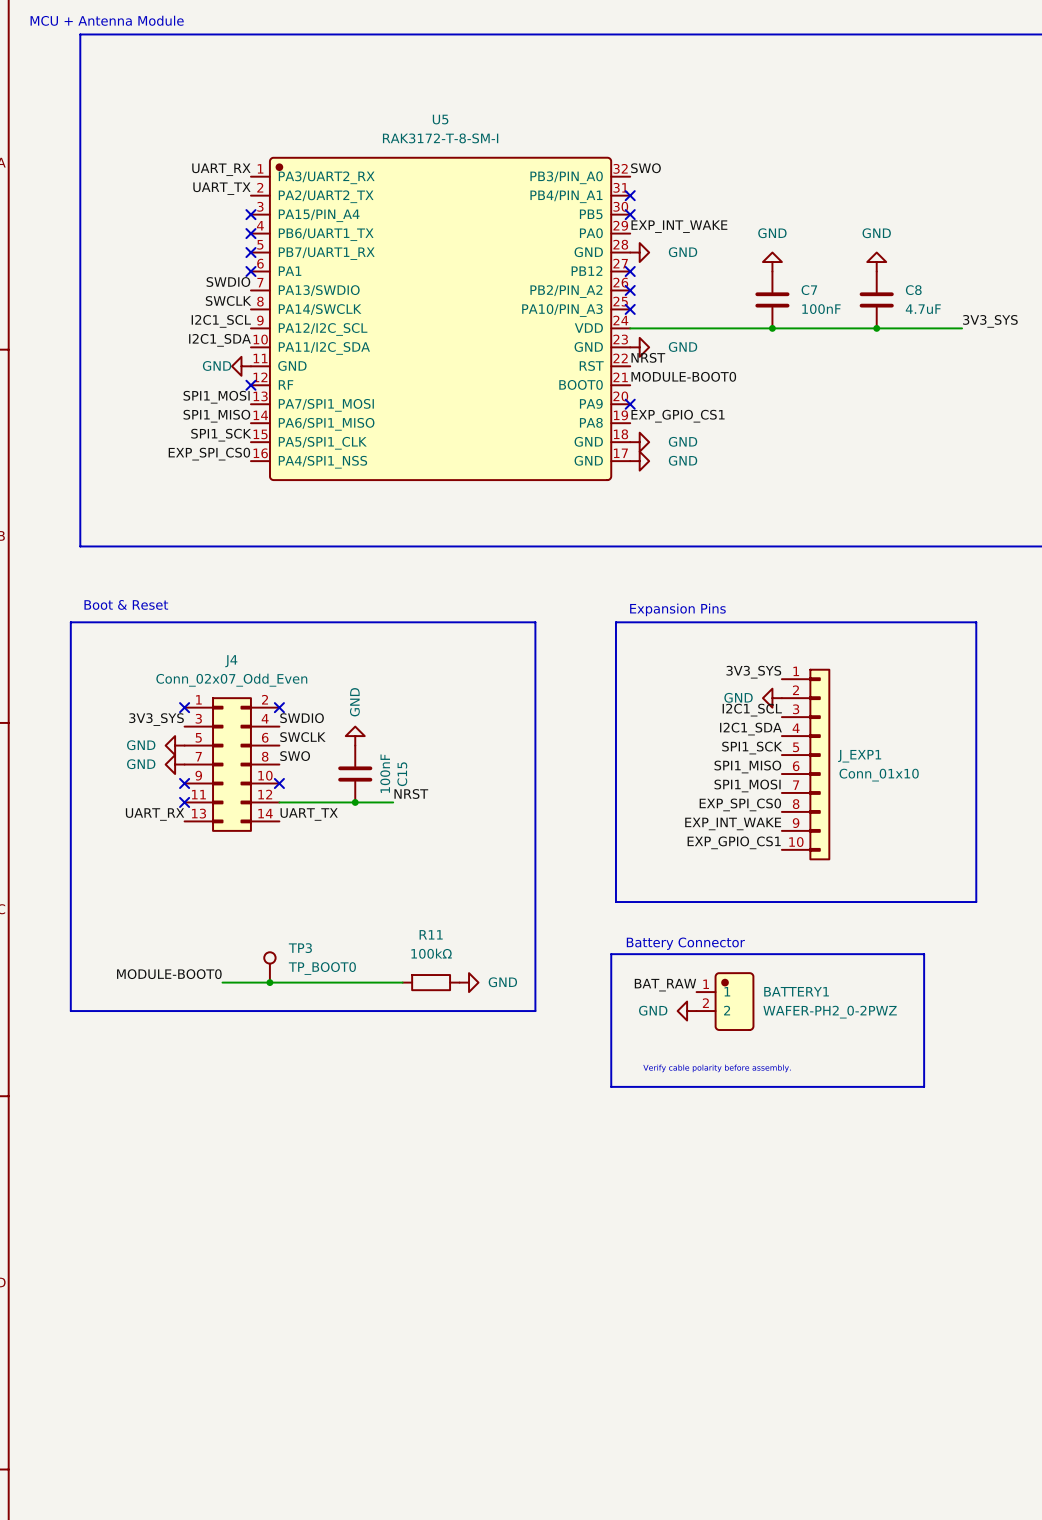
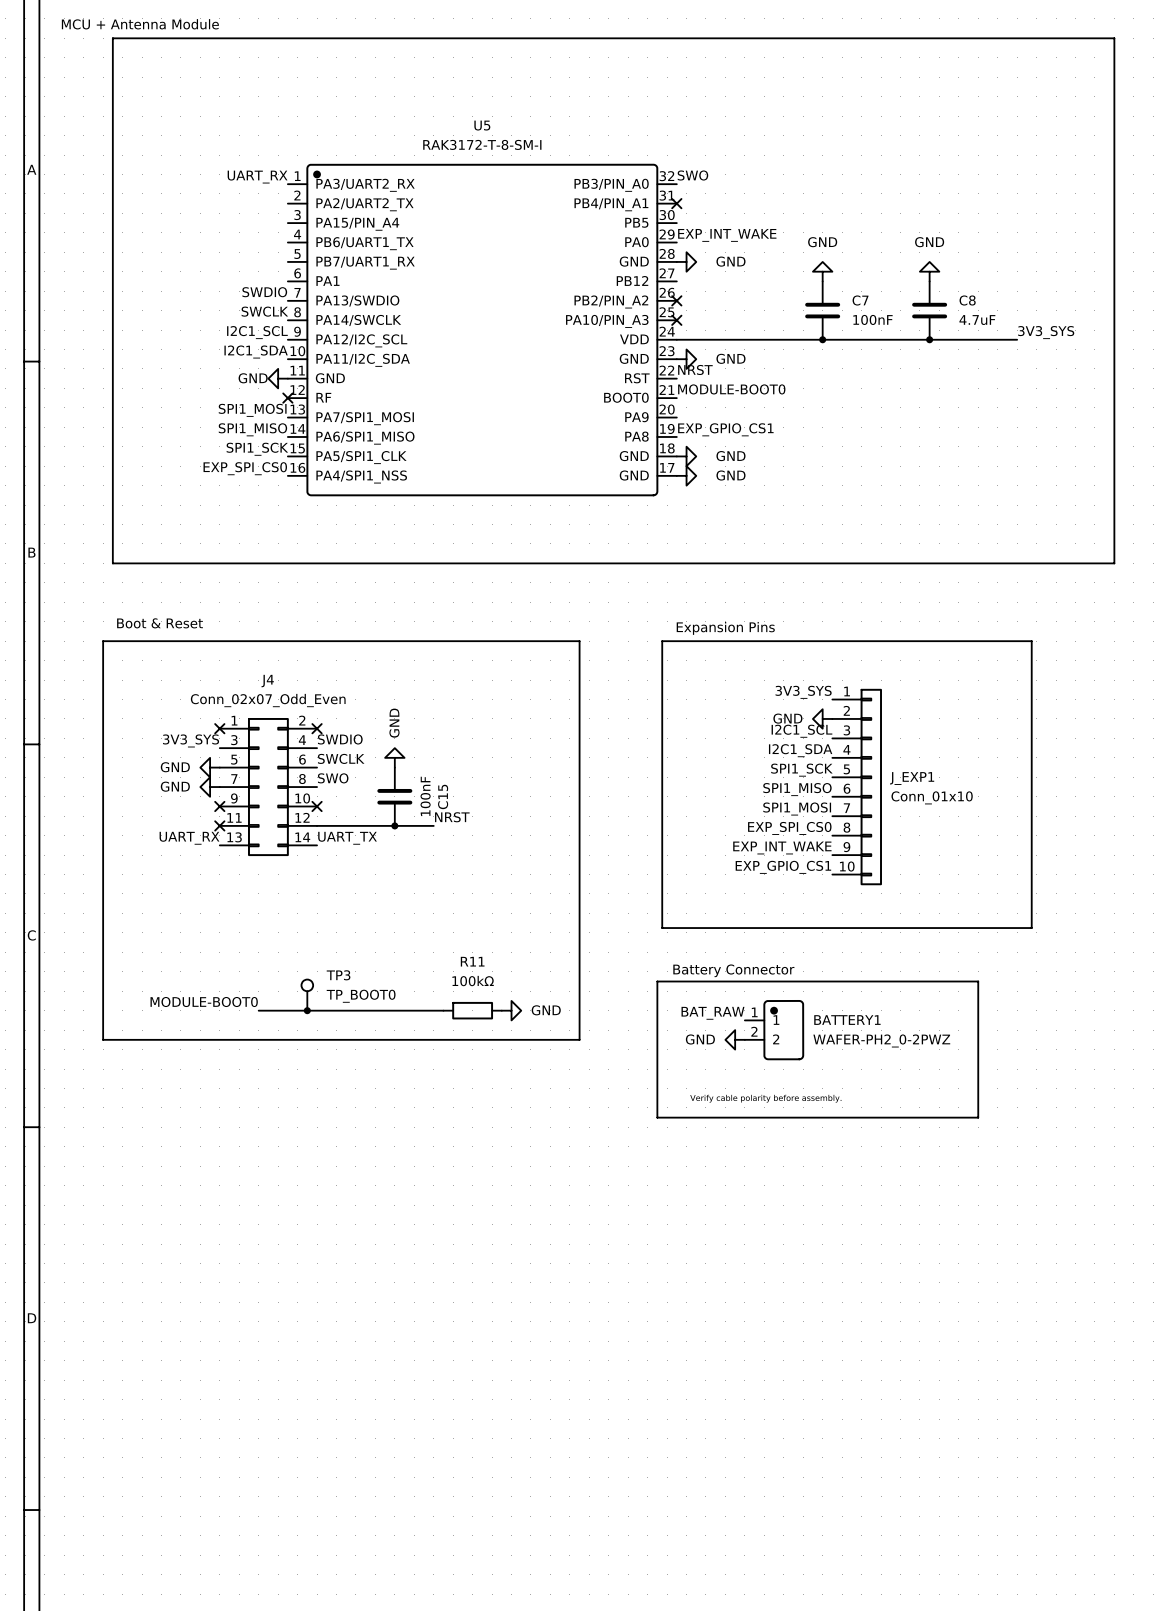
label: UART_TX (221, 188) -> none
no-connect mark: (250, 214) -> none
no-connect mark: (630, 214) -> none
no-connect mark: (250, 233) -> none
no-connect mark: (250, 252) -> none
no-connect mark: (250, 271) -> none
no-connect mark: (630, 271) -> none
no-connect mark: (630, 404) -> none

